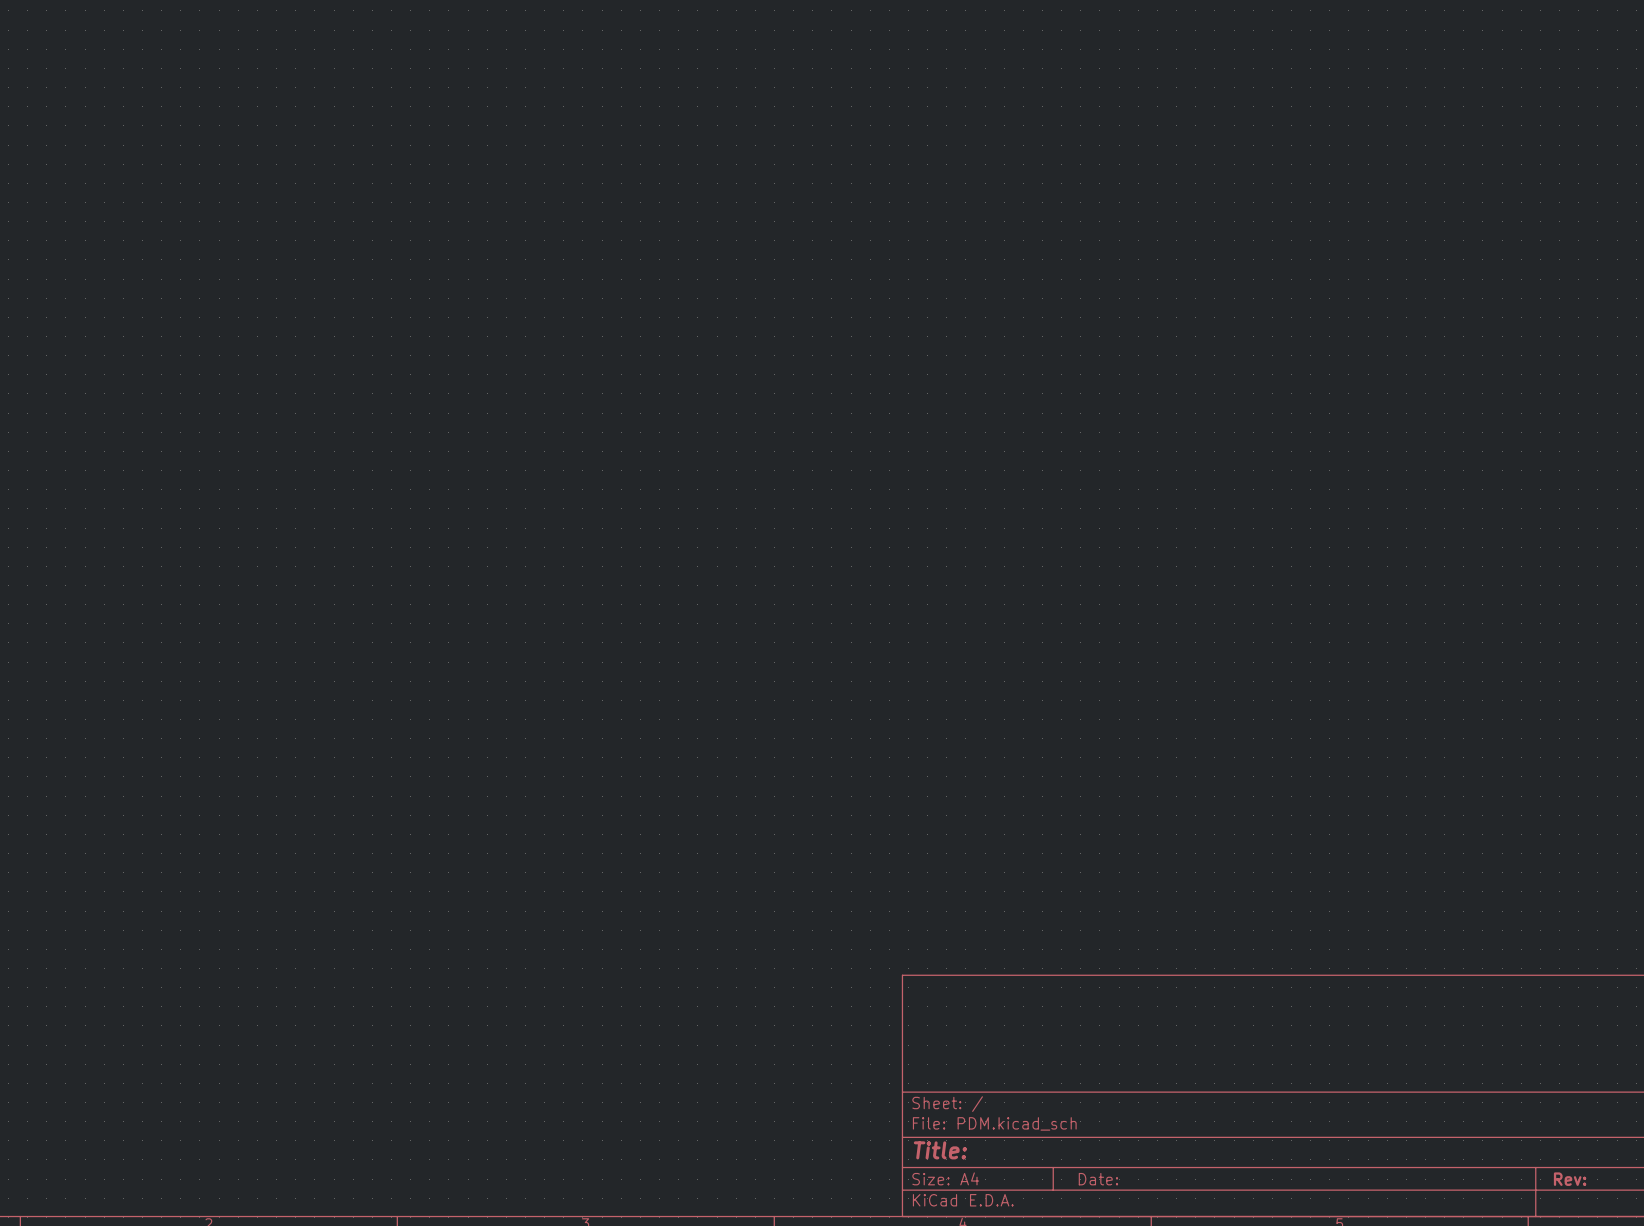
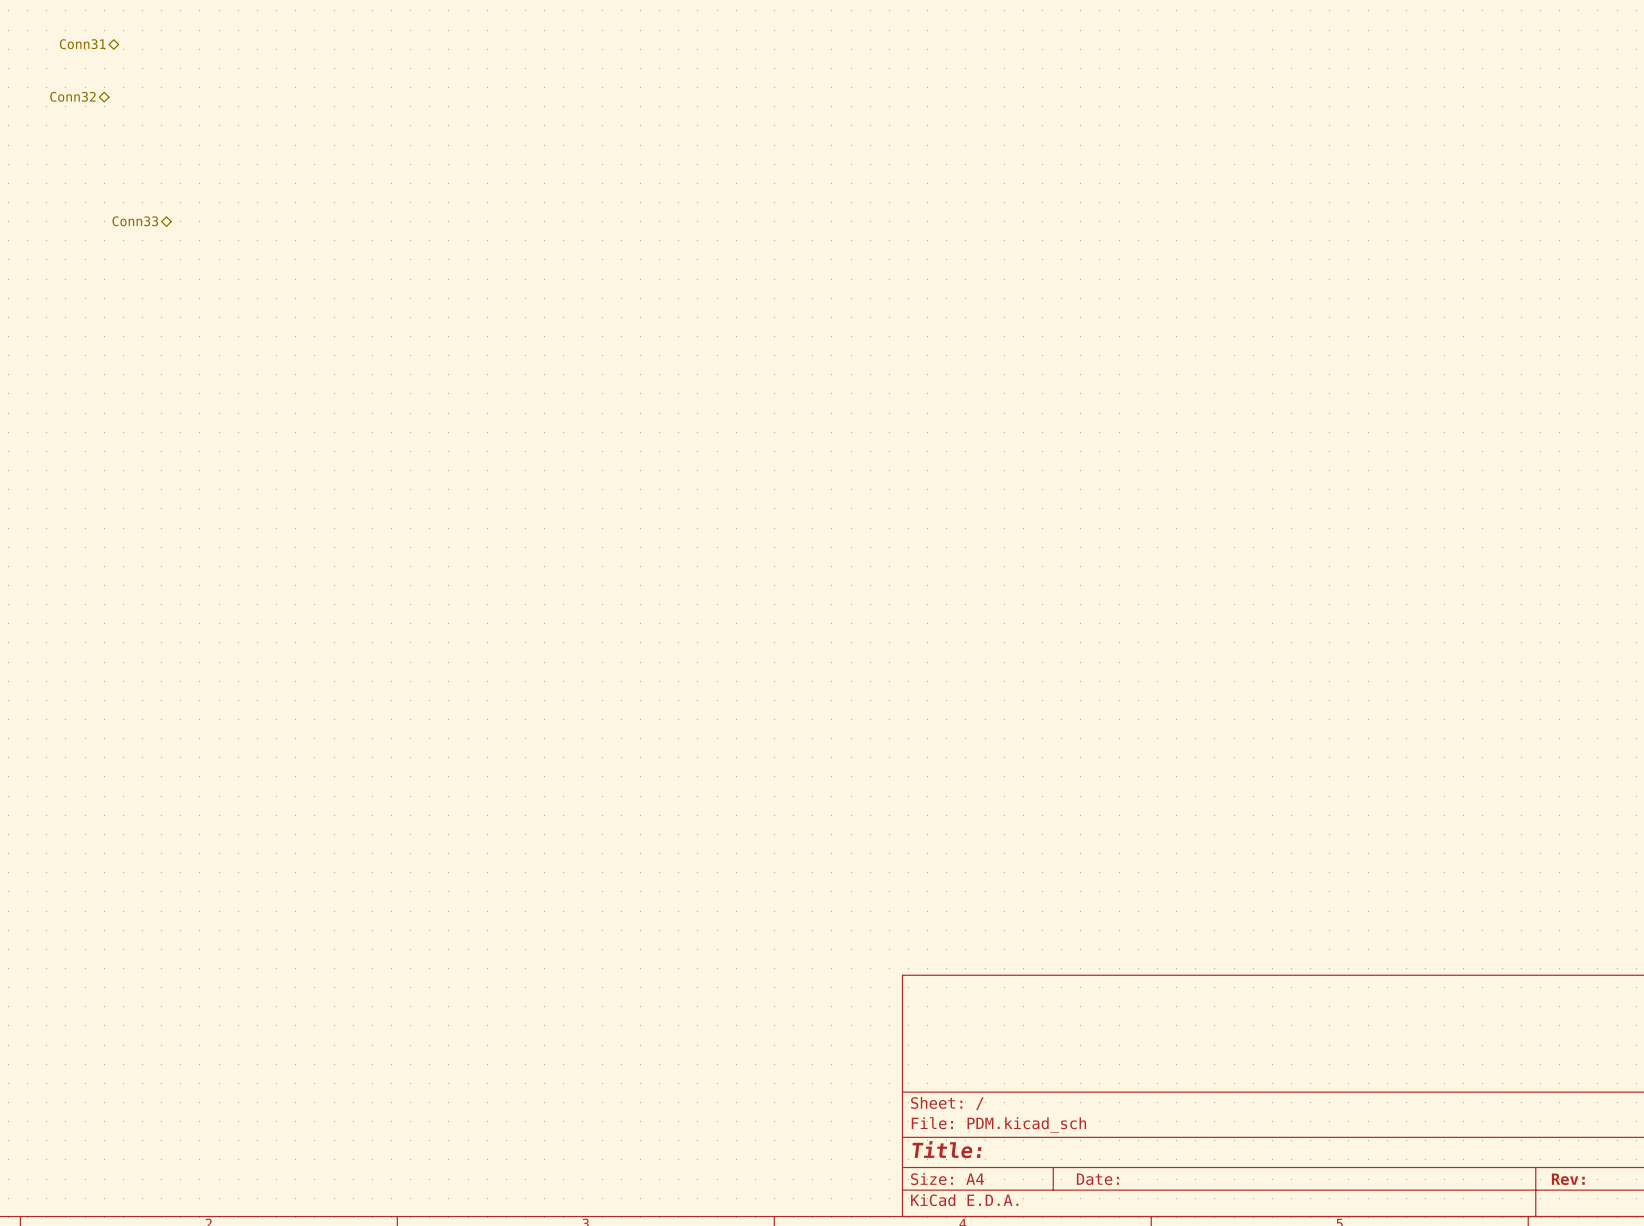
hierarchical label: none -> Conn31 (82, 44)
hierarchical label: none -> Conn32 (73, 96)
hierarchical label: none -> Conn33 (135, 221)

